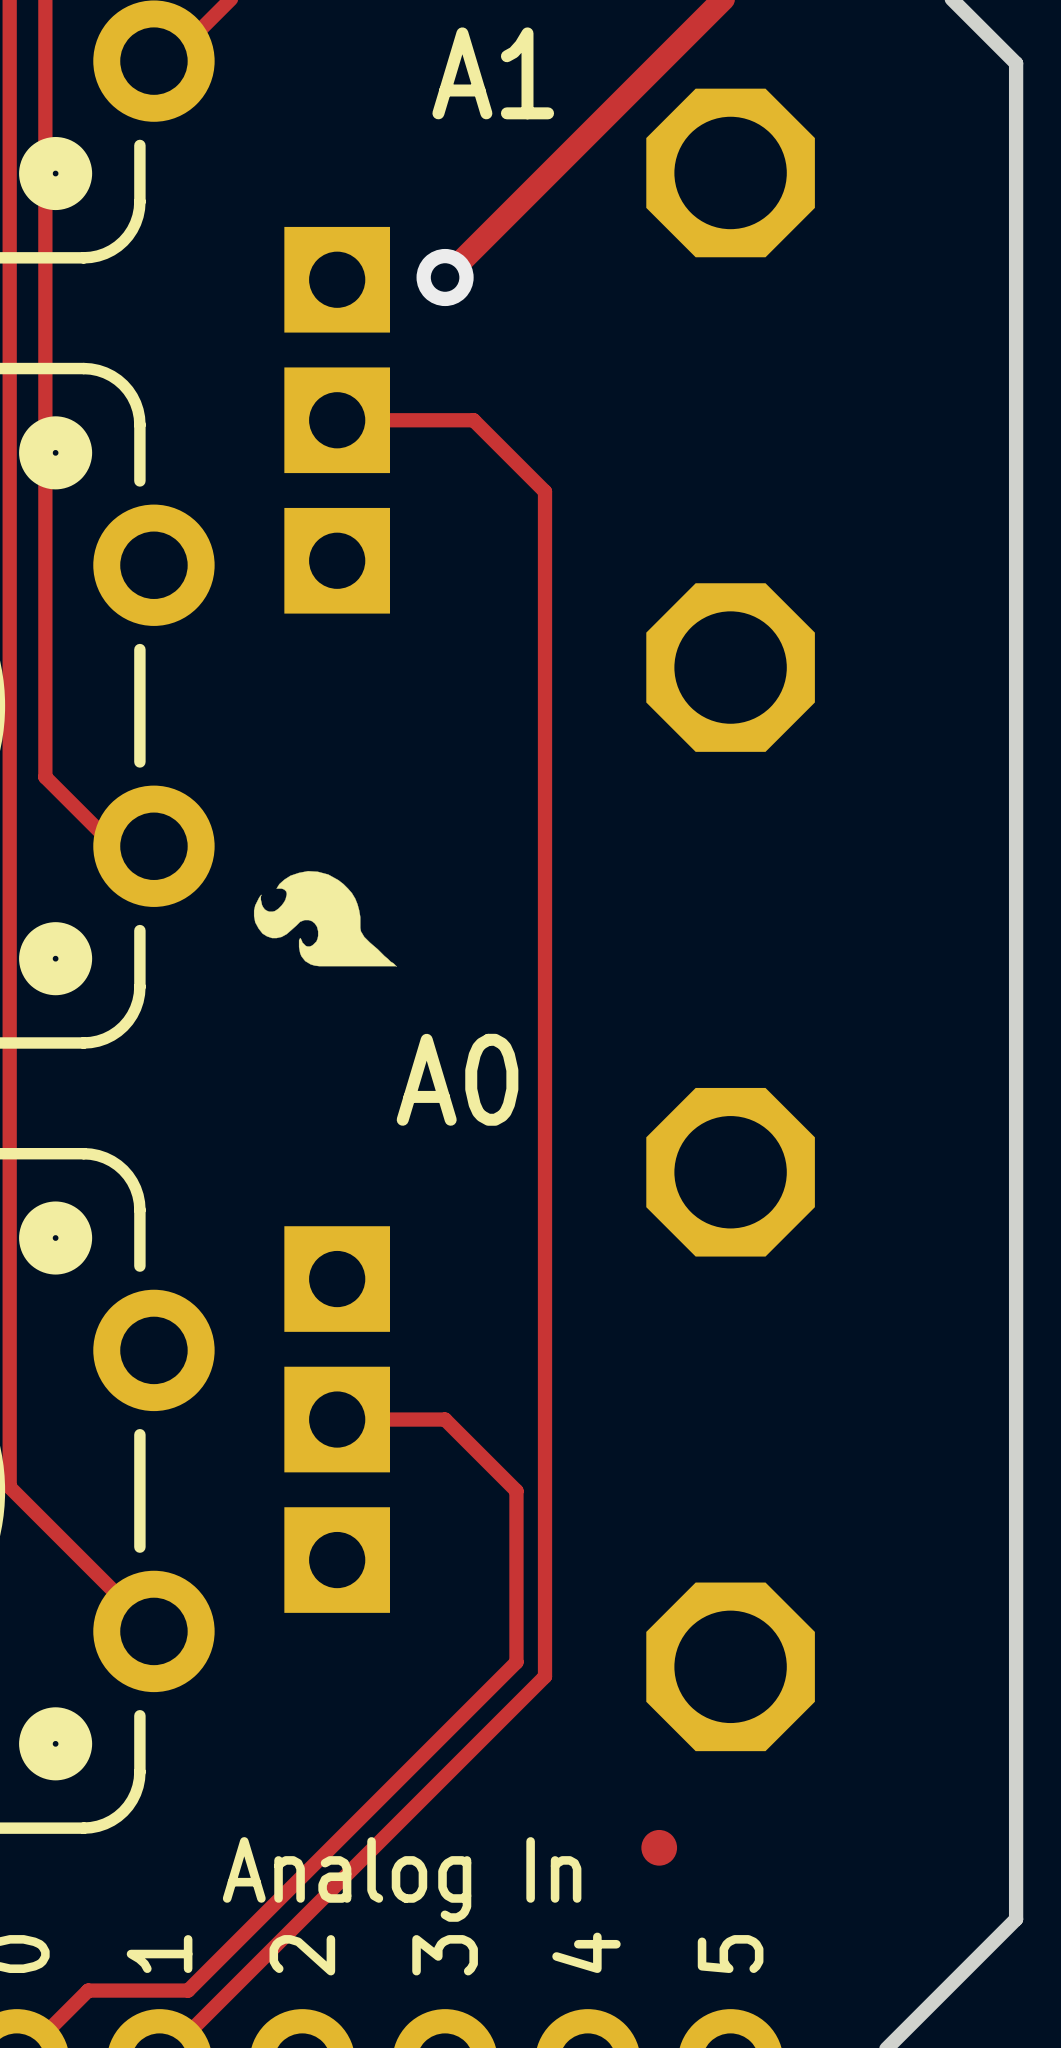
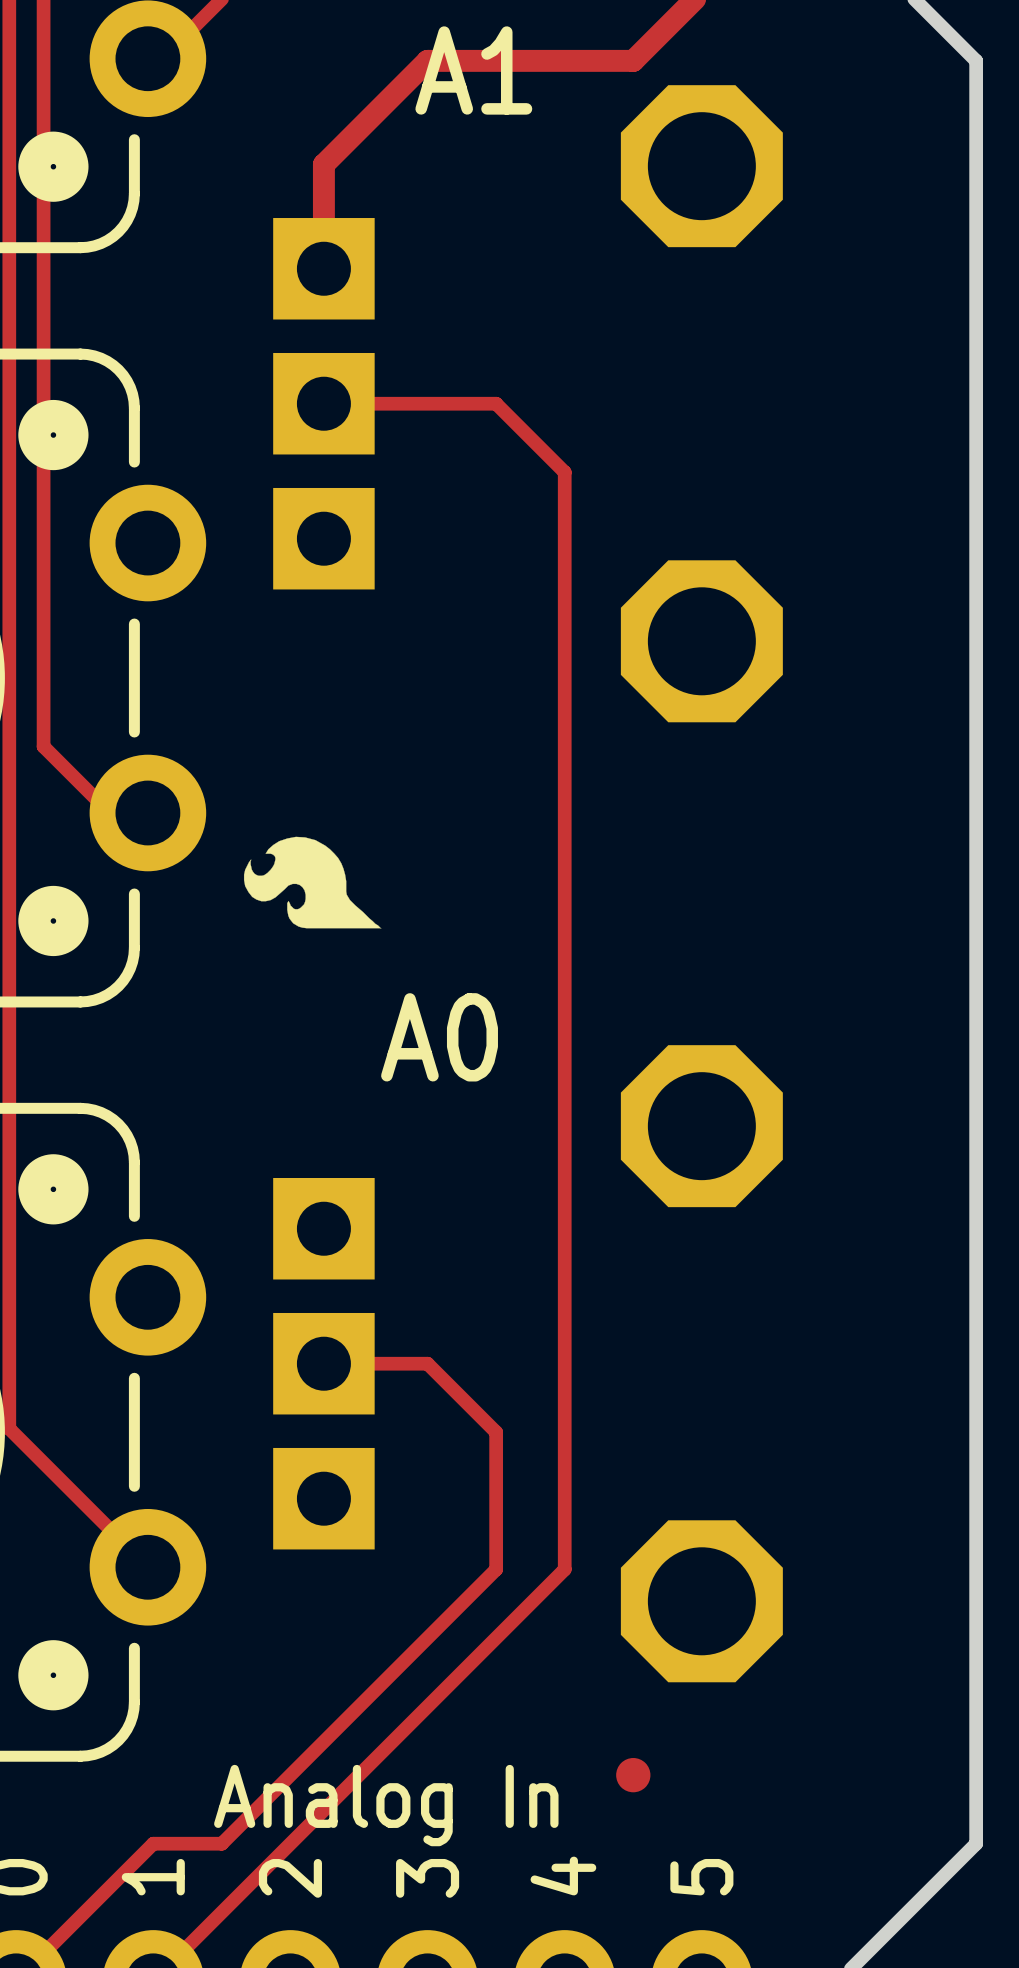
track: (659, 63) (445, 277) -> (633, 60) (427, 60) (323, 164) (323, 268)
via: (445, 277) -> none
track: (473, 420) (545, 491) (545, 1676) -> (455, 403) (496, 403) (564, 472) (564, 1569) (523, 1610)
track: (516, 1633) (516, 1662) (188, 1990) (88, 1990) -> (496, 1569) (221, 1843) (153, 1843) (84, 1912)

